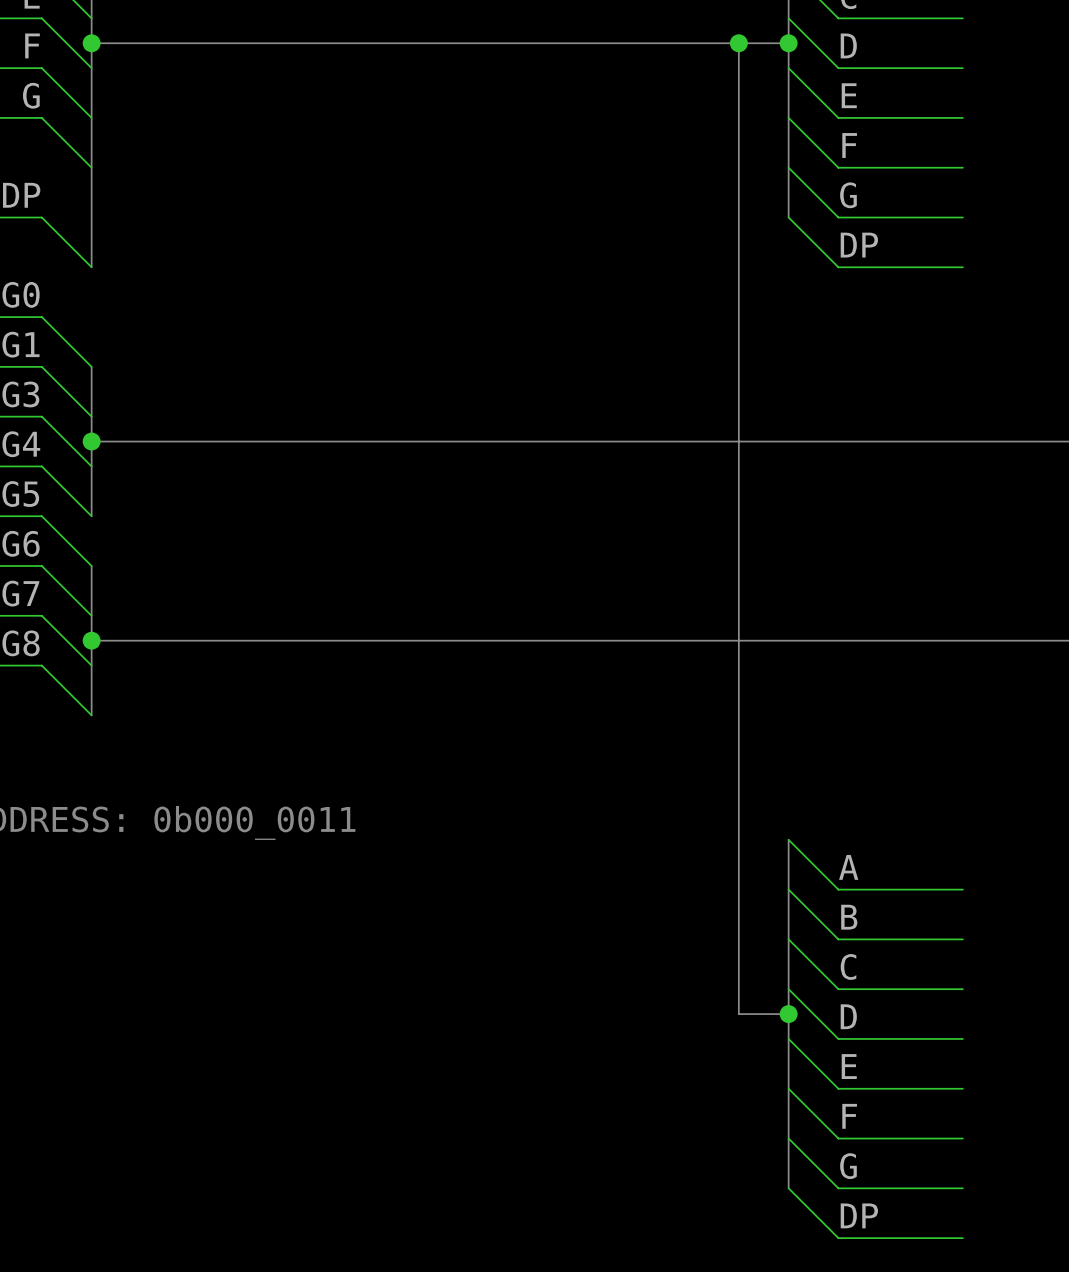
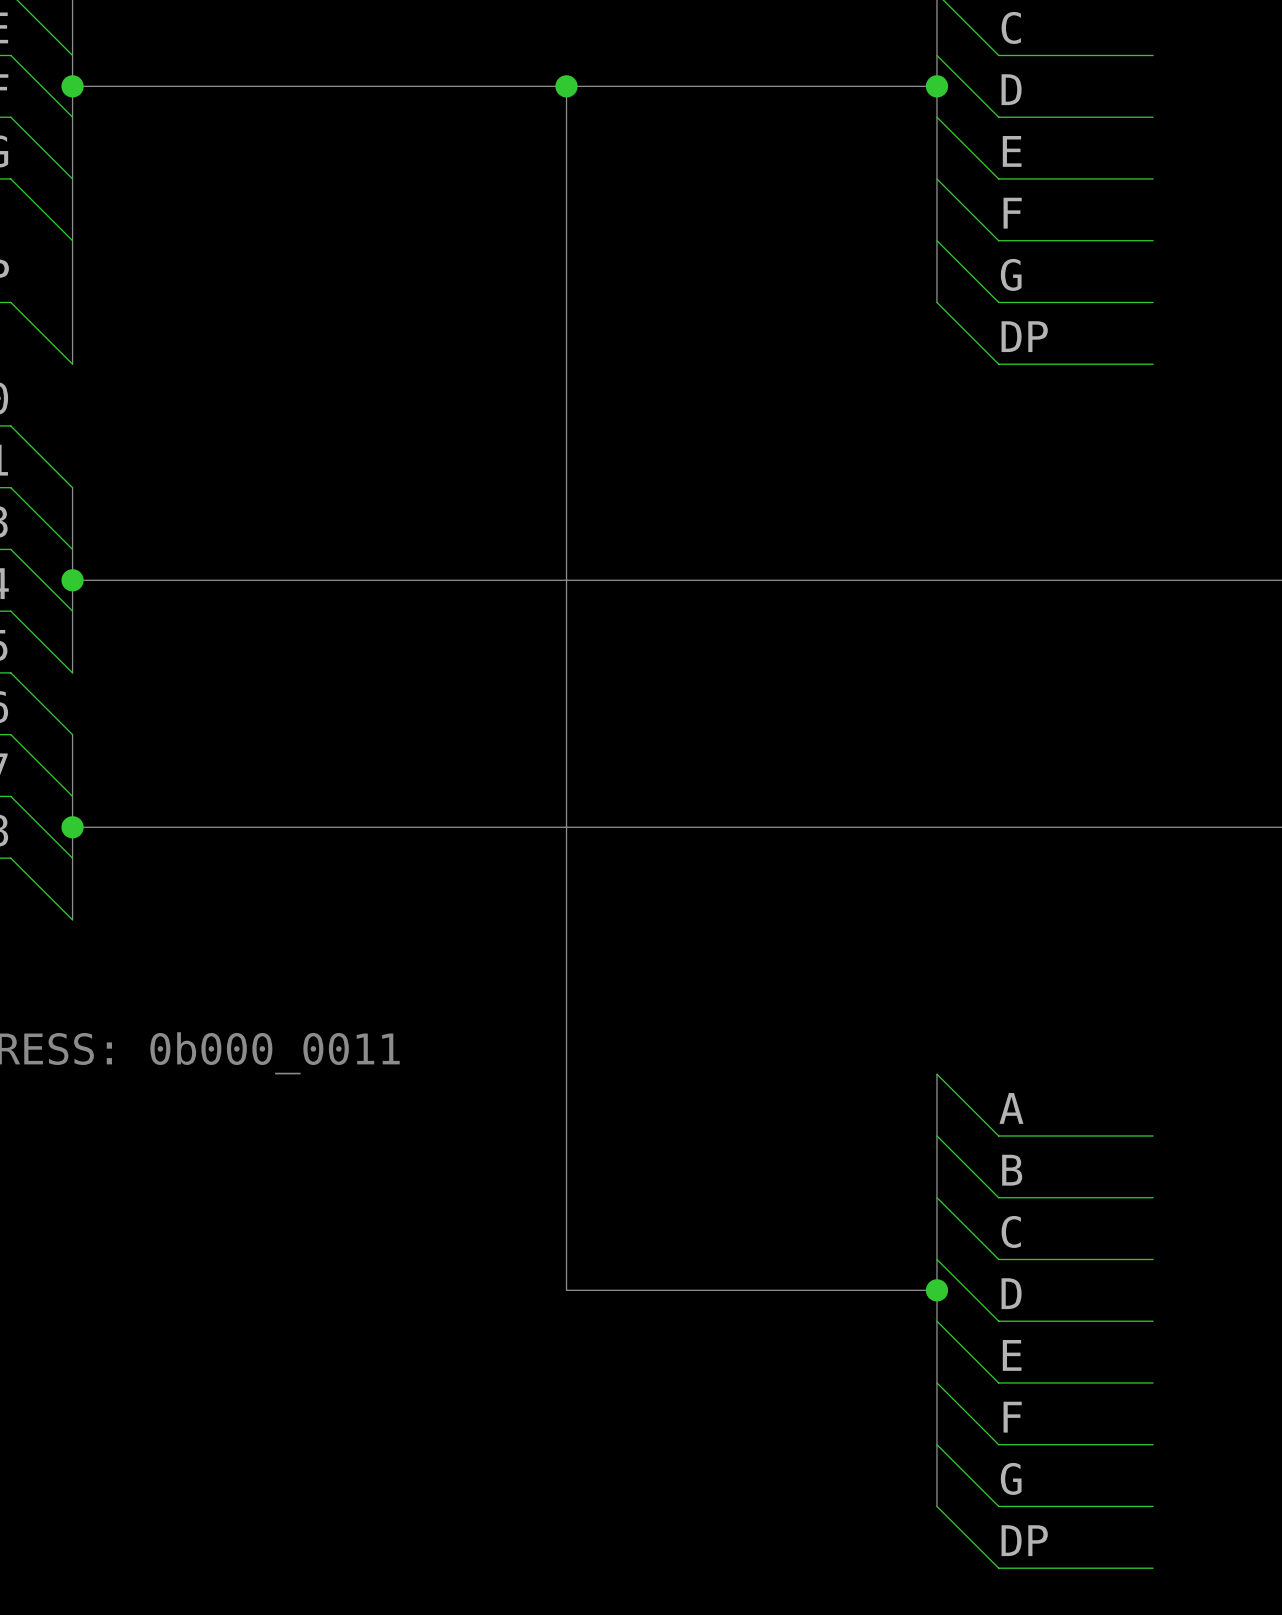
junction: none -> (566, 86)
bus: (738, 43) (738, 1014) -> (566, 86) (566, 1290) (875, 1290)
junction: (738, 43) -> none

